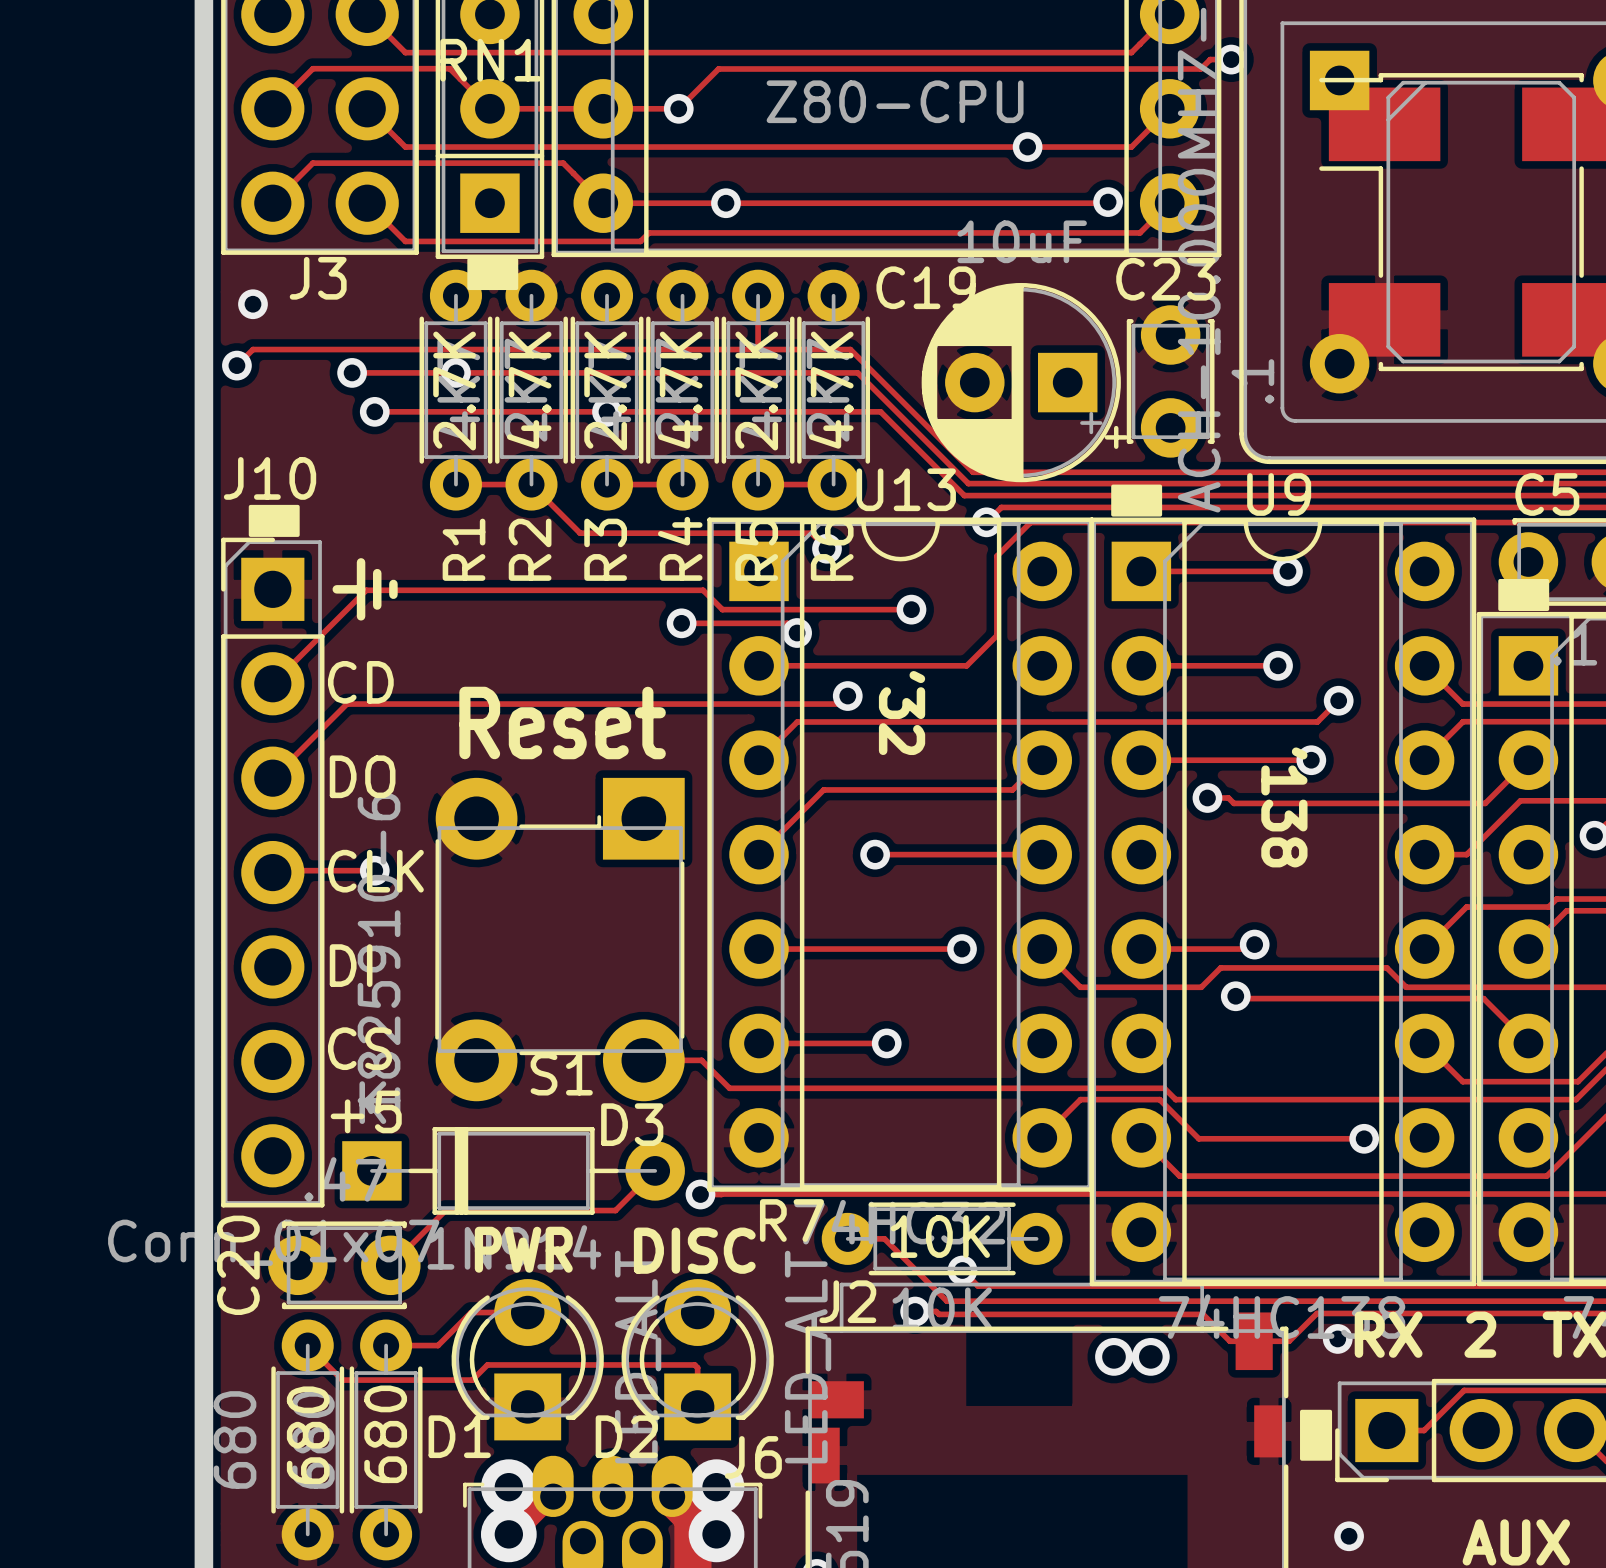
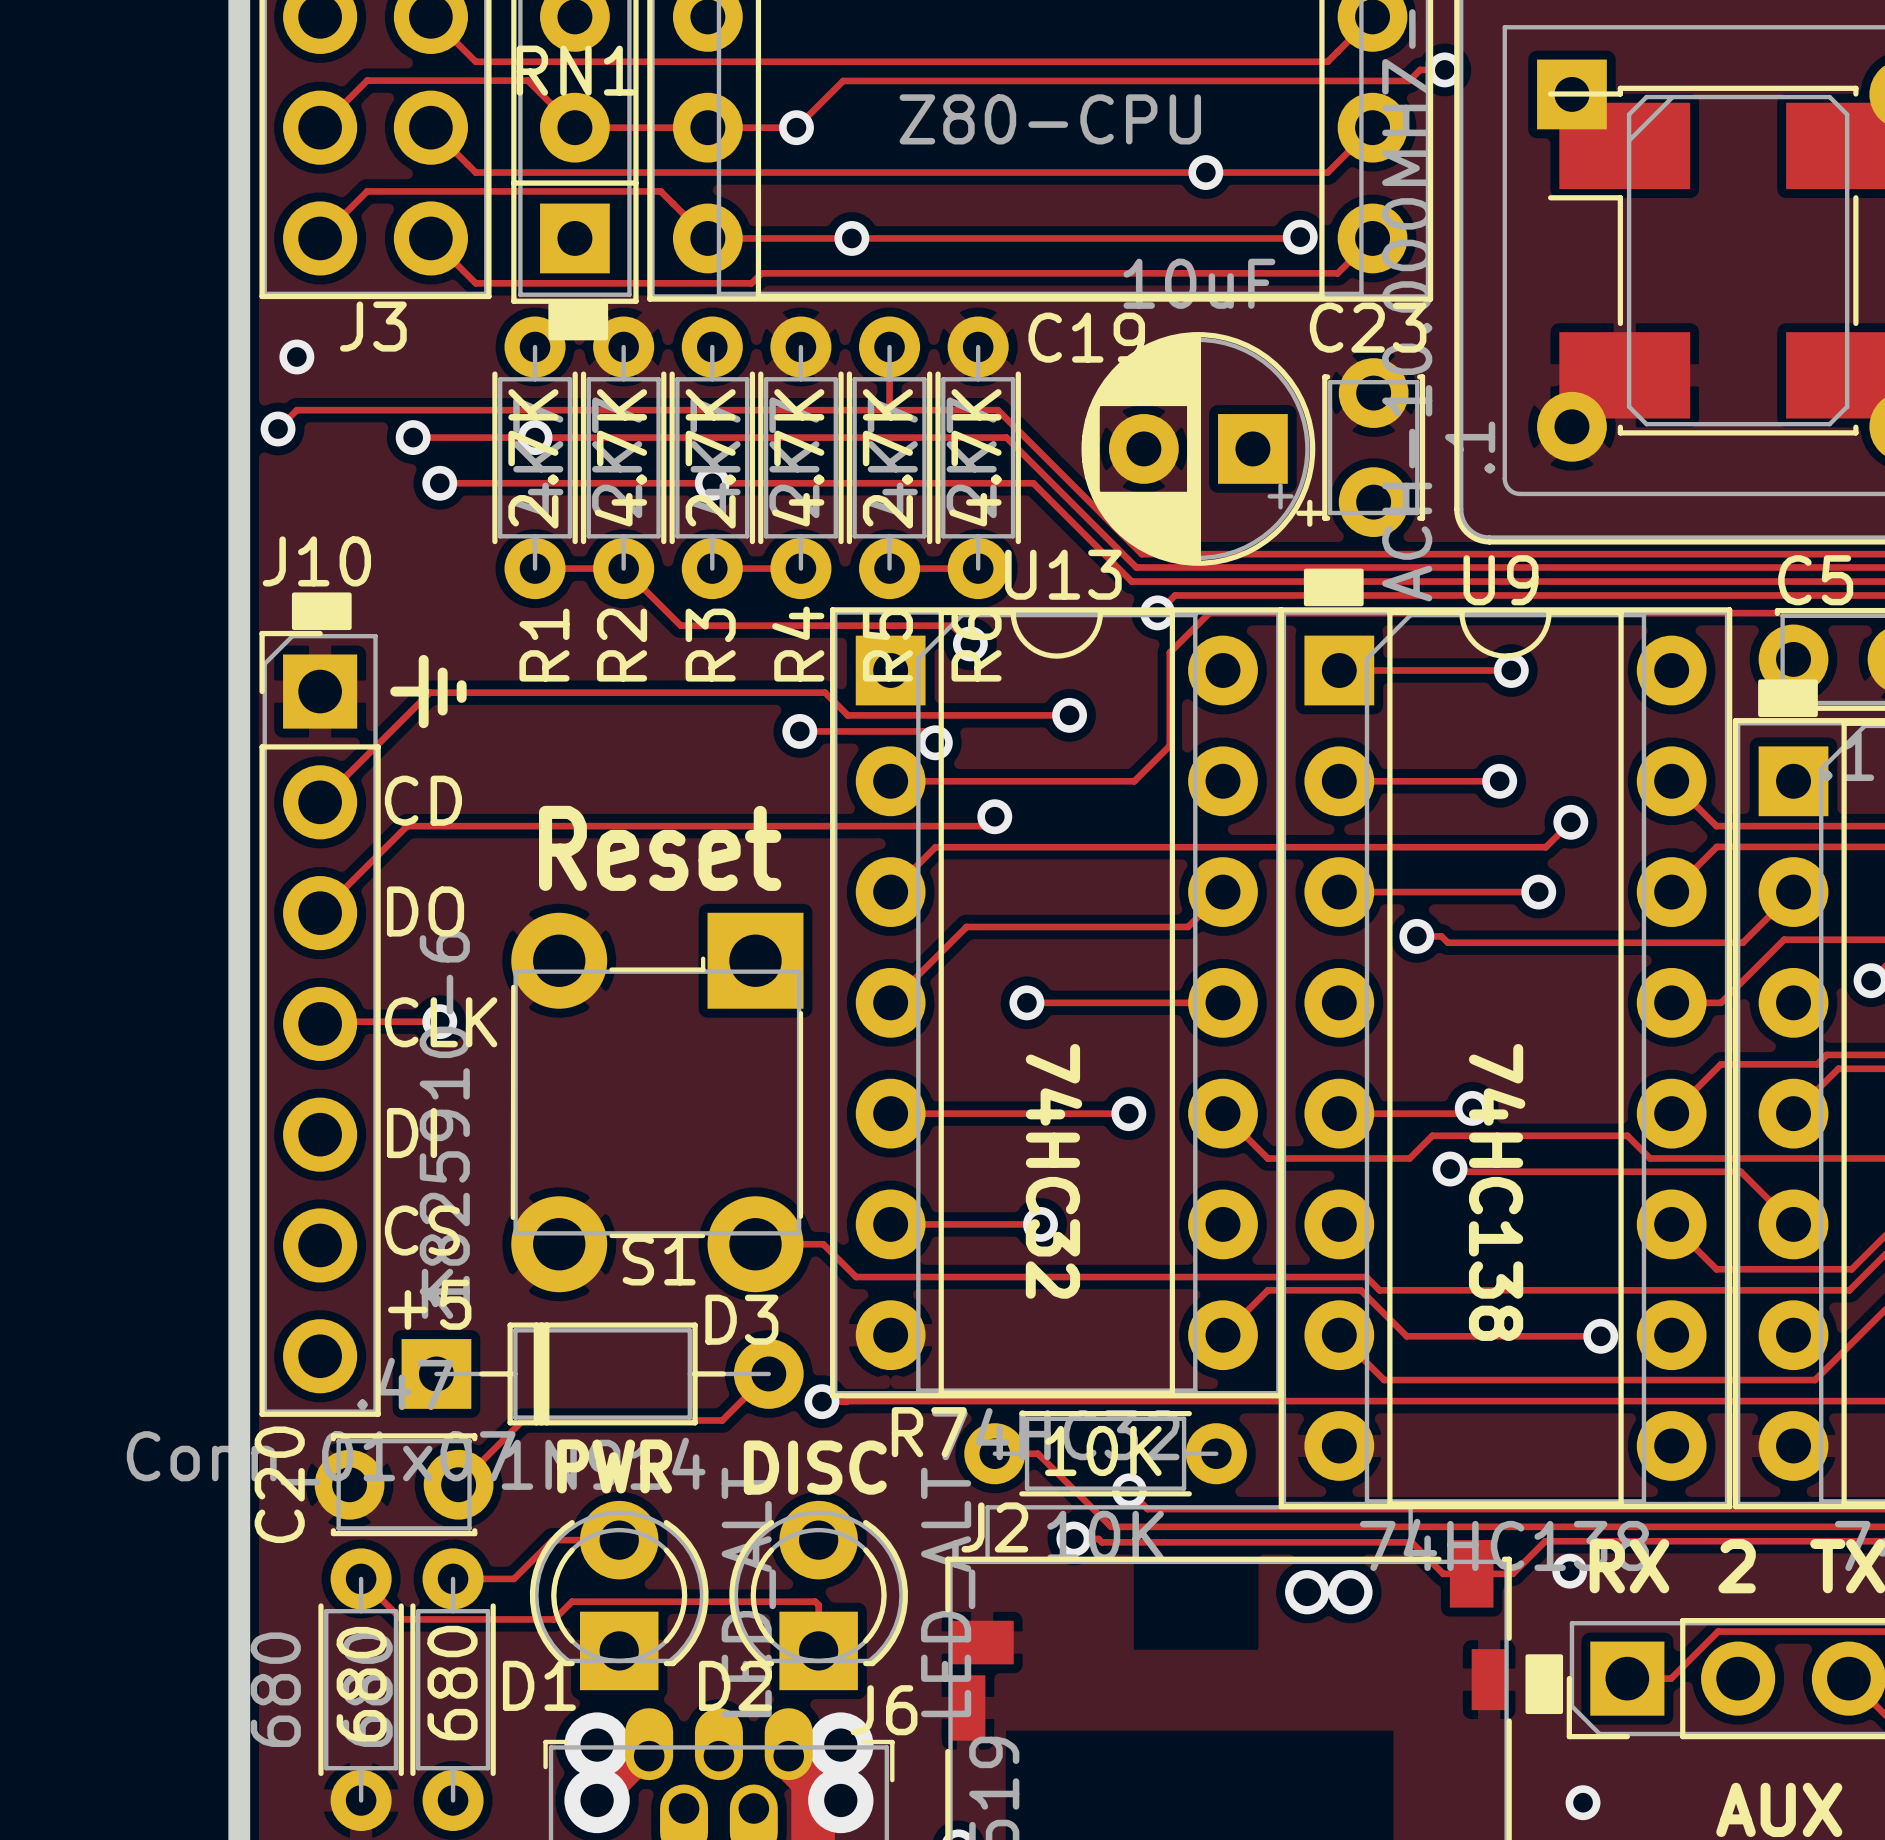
text: '32 (902, 713) -> none
text: '138 (1284, 807) -> none
text: none -> 74HC32 (1053, 1171)
text: none -> 74HC138 (1497, 1192)

